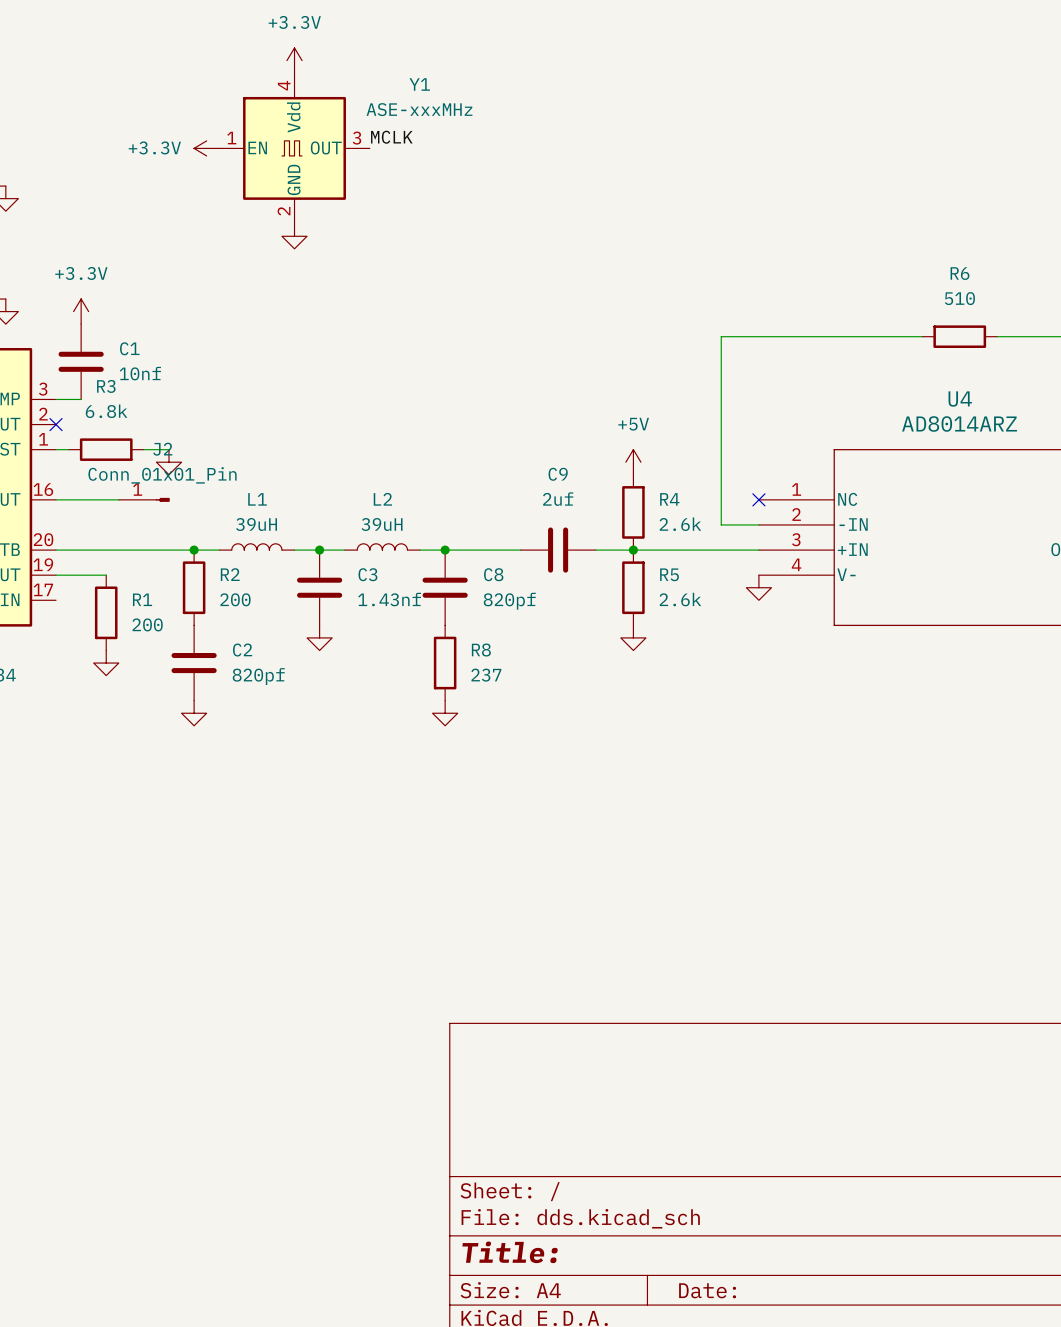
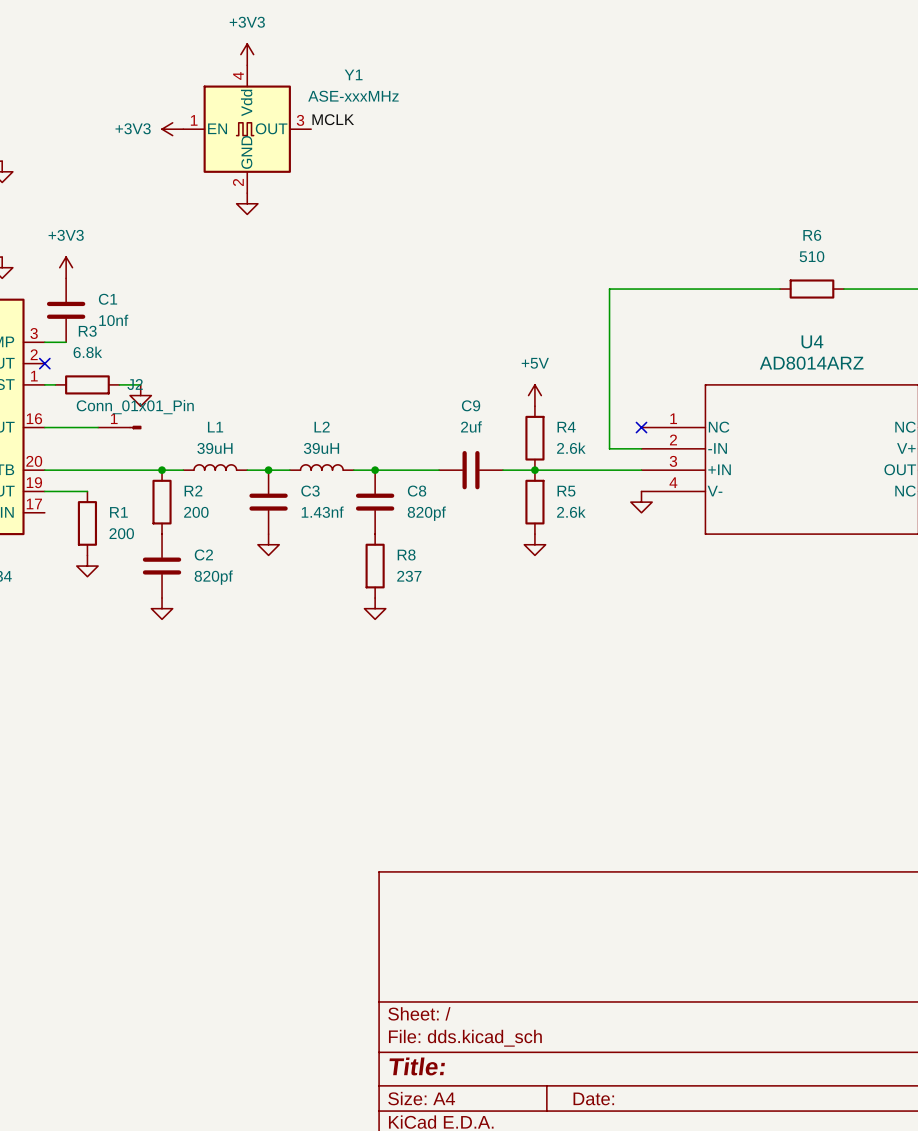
power symbol: +3.3V (294, 60) -> +3V3 (247, 54)
power symbol: +3.3V (206, 148) -> +3V3 (172, 129)
power symbol: +3.3V (81, 311) -> +3V3 (66, 267)

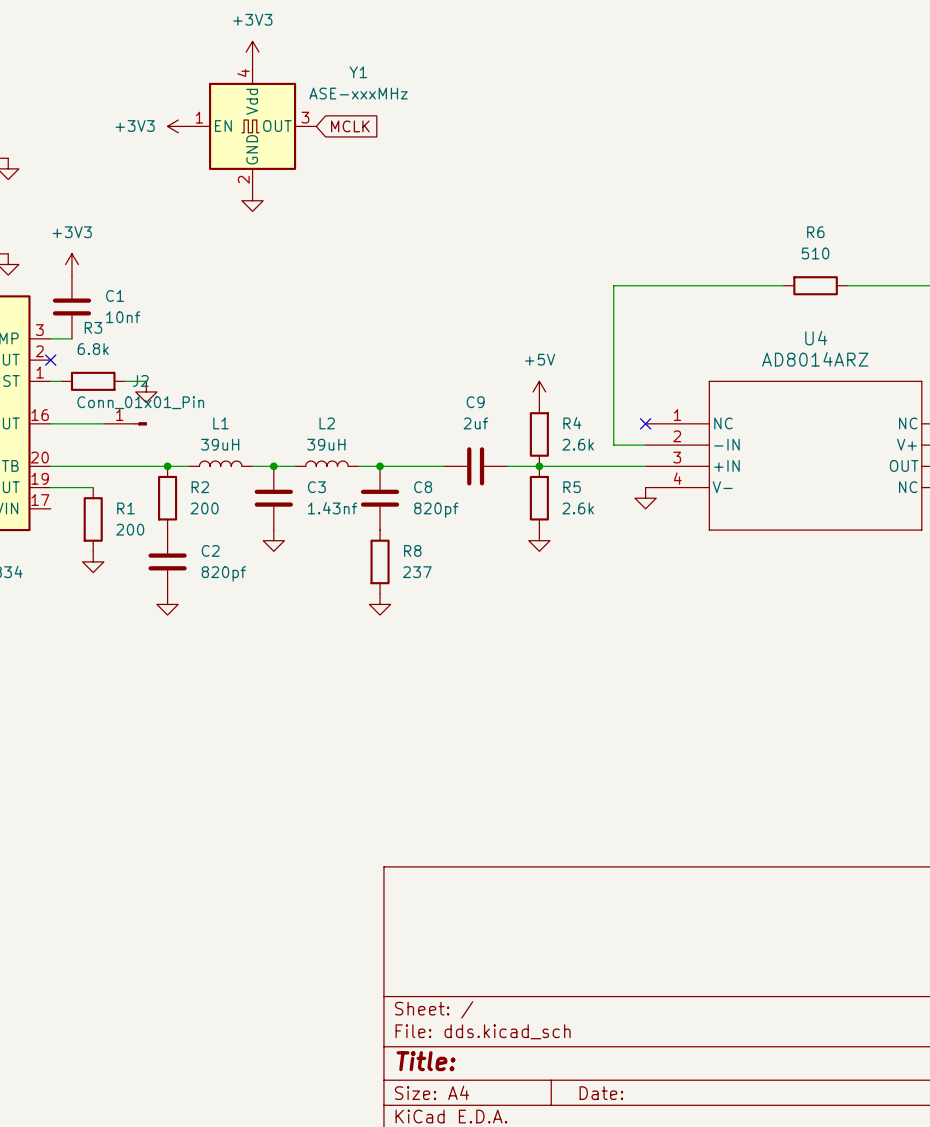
label: MCLK (333, 119) -> none
global label: none -> MCLK (350, 126)

